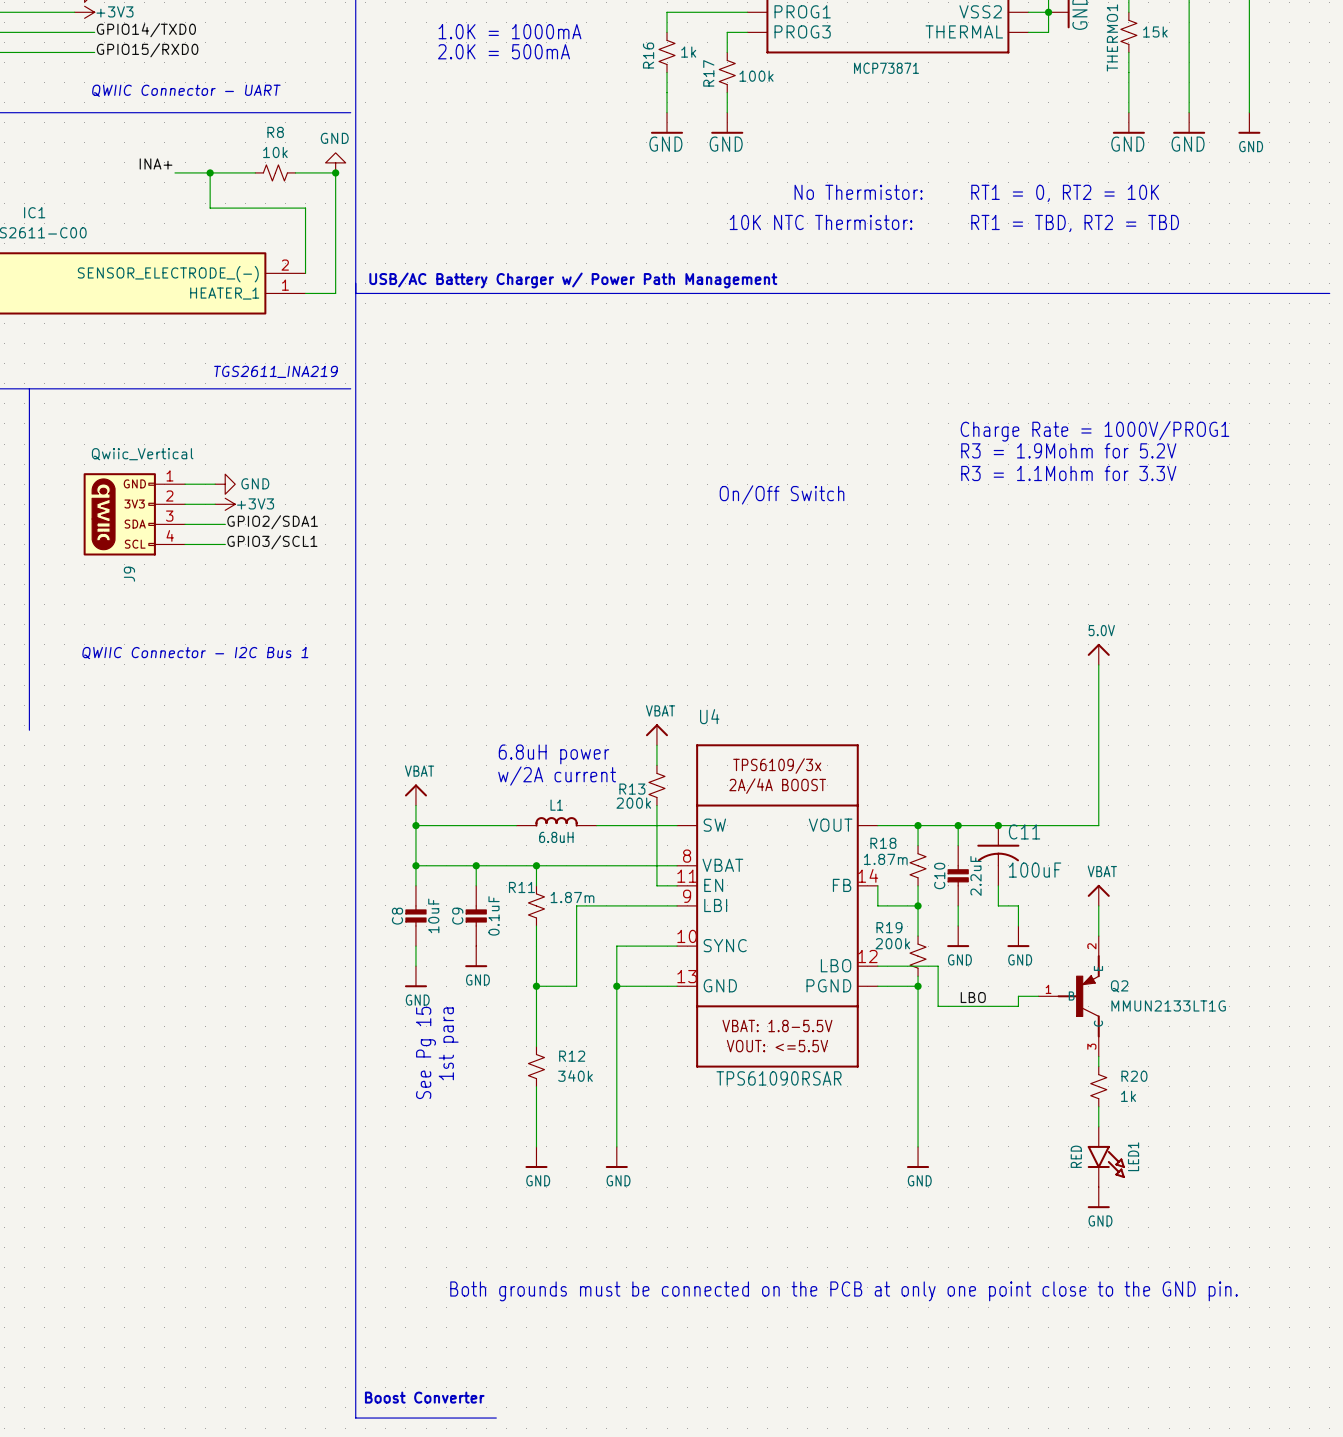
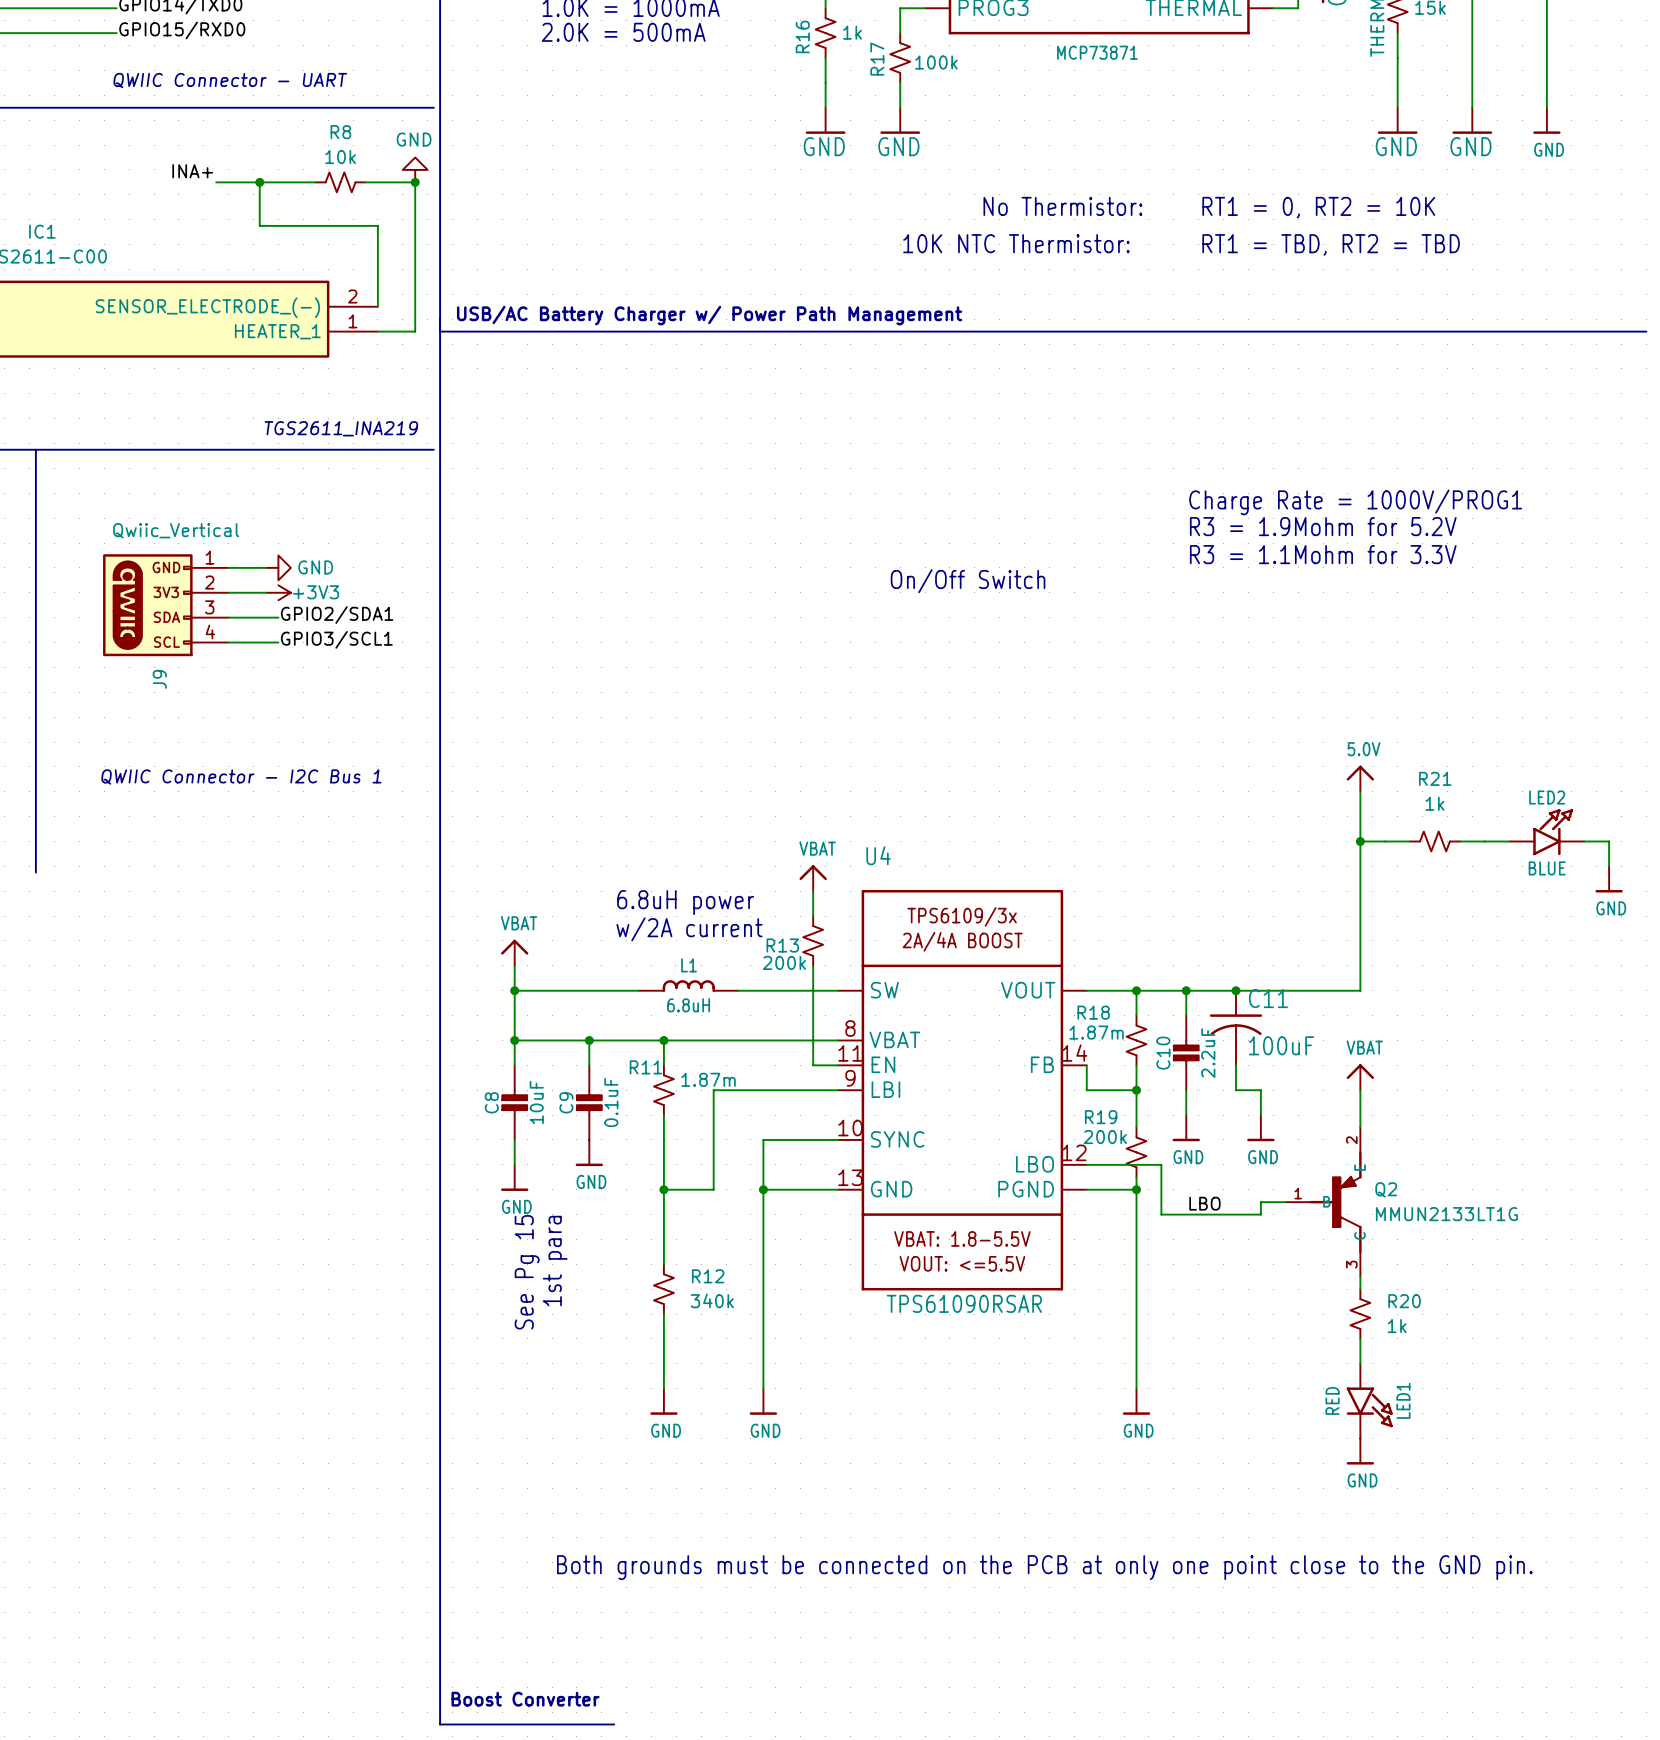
LED2: none -> BLUE (1546, 832)
wire: none -> (1360, 841) (1410, 841)
junction: none -> (1360, 841)
R21: none -> 1k (1434, 841)
wire: none -> (1459, 841) (1509, 841)
wire: none -> (1584, 841) (1609, 841) (1609, 866)
power symbol: none -> GND (1609, 879)

